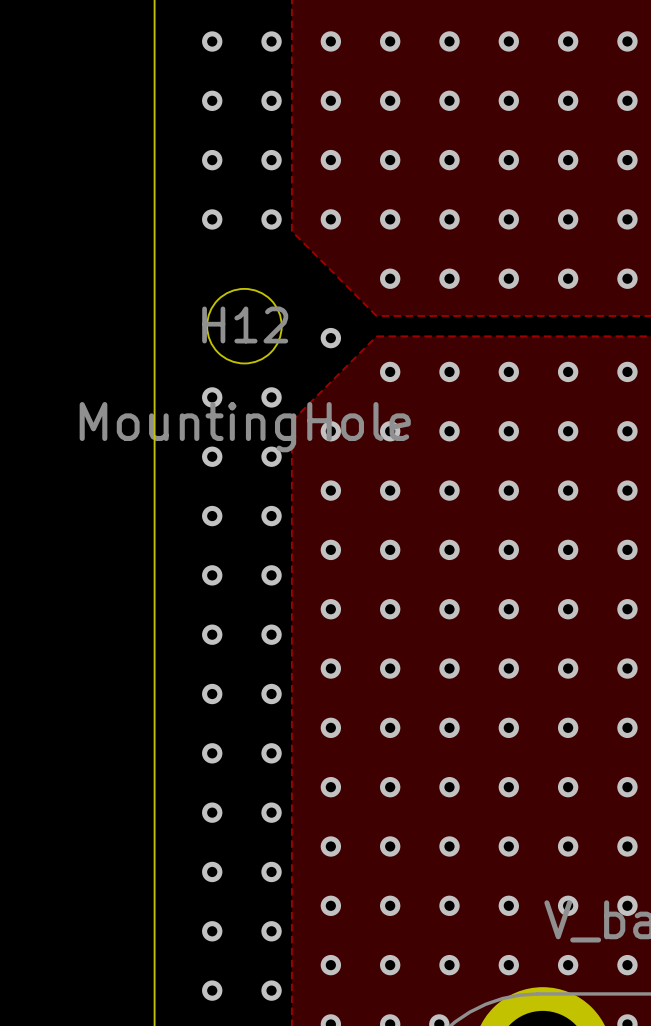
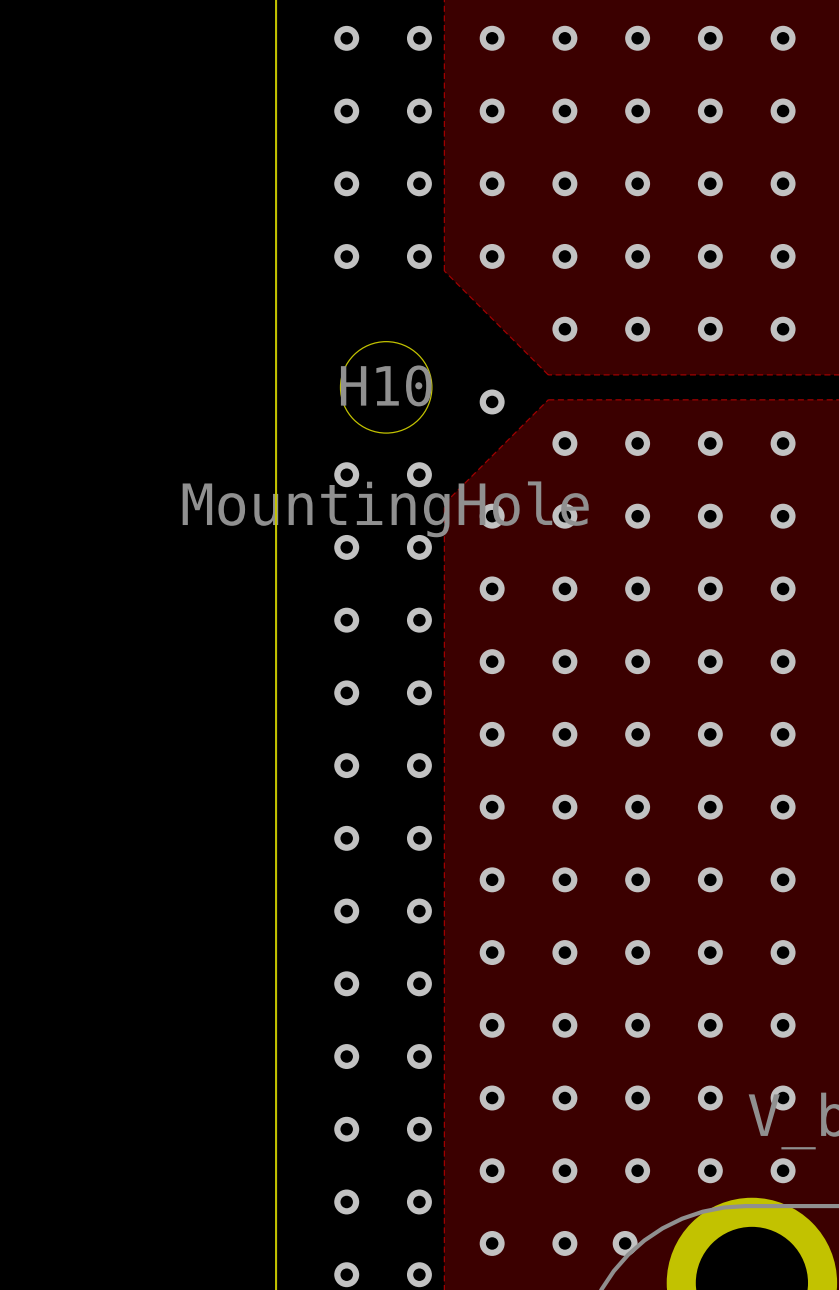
H12 name: H12 (245, 324) -> H10 (386, 385)

